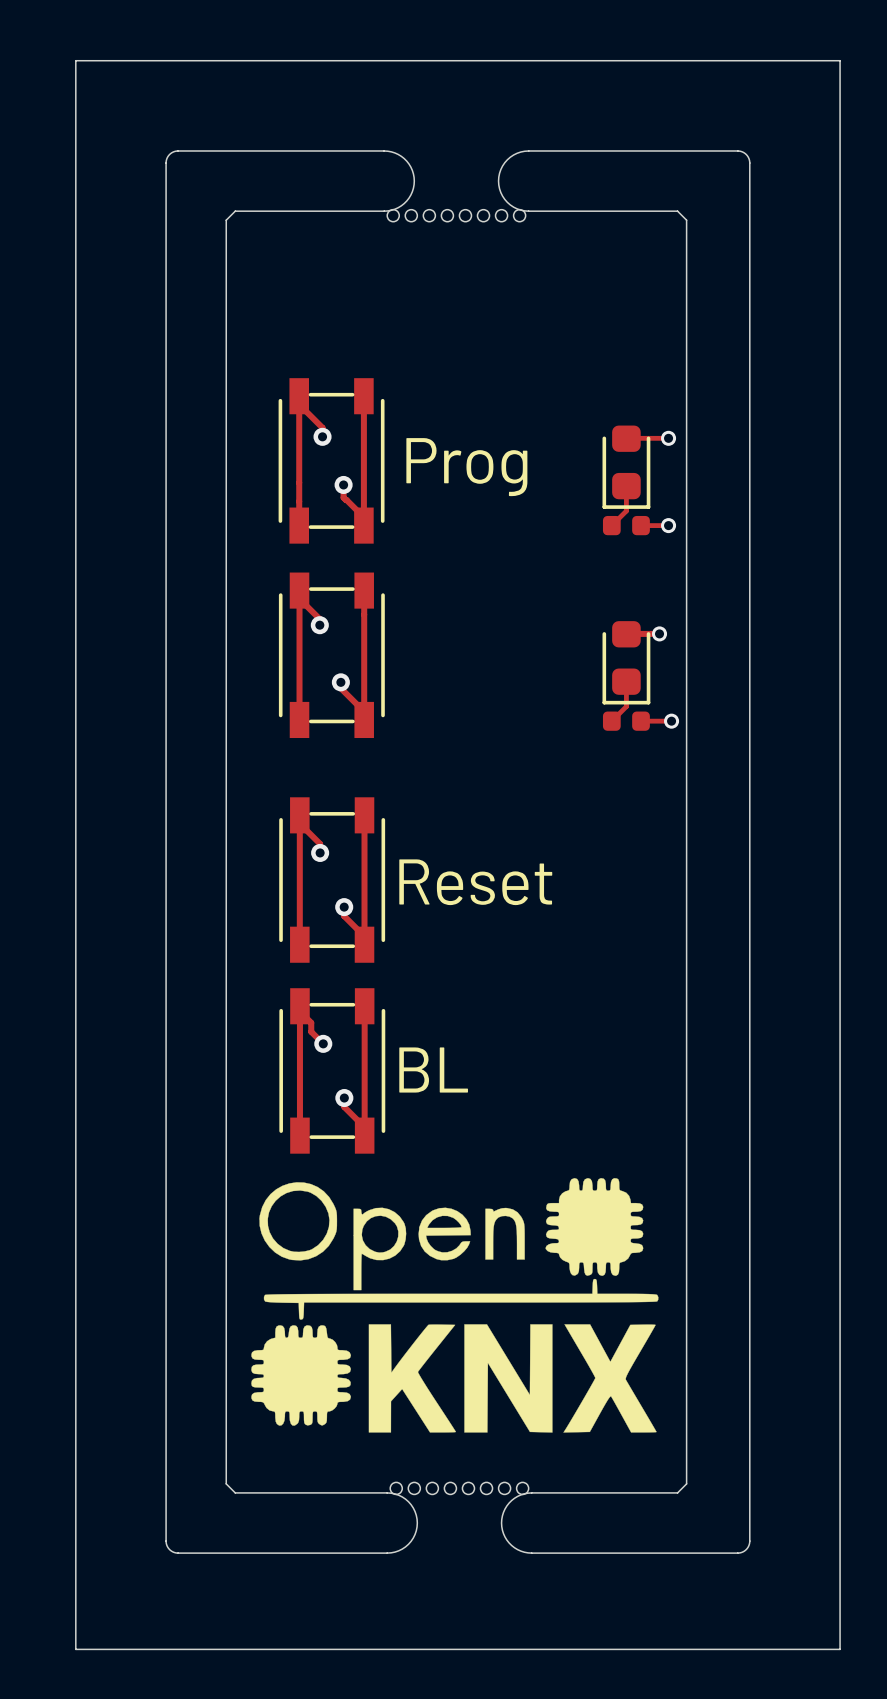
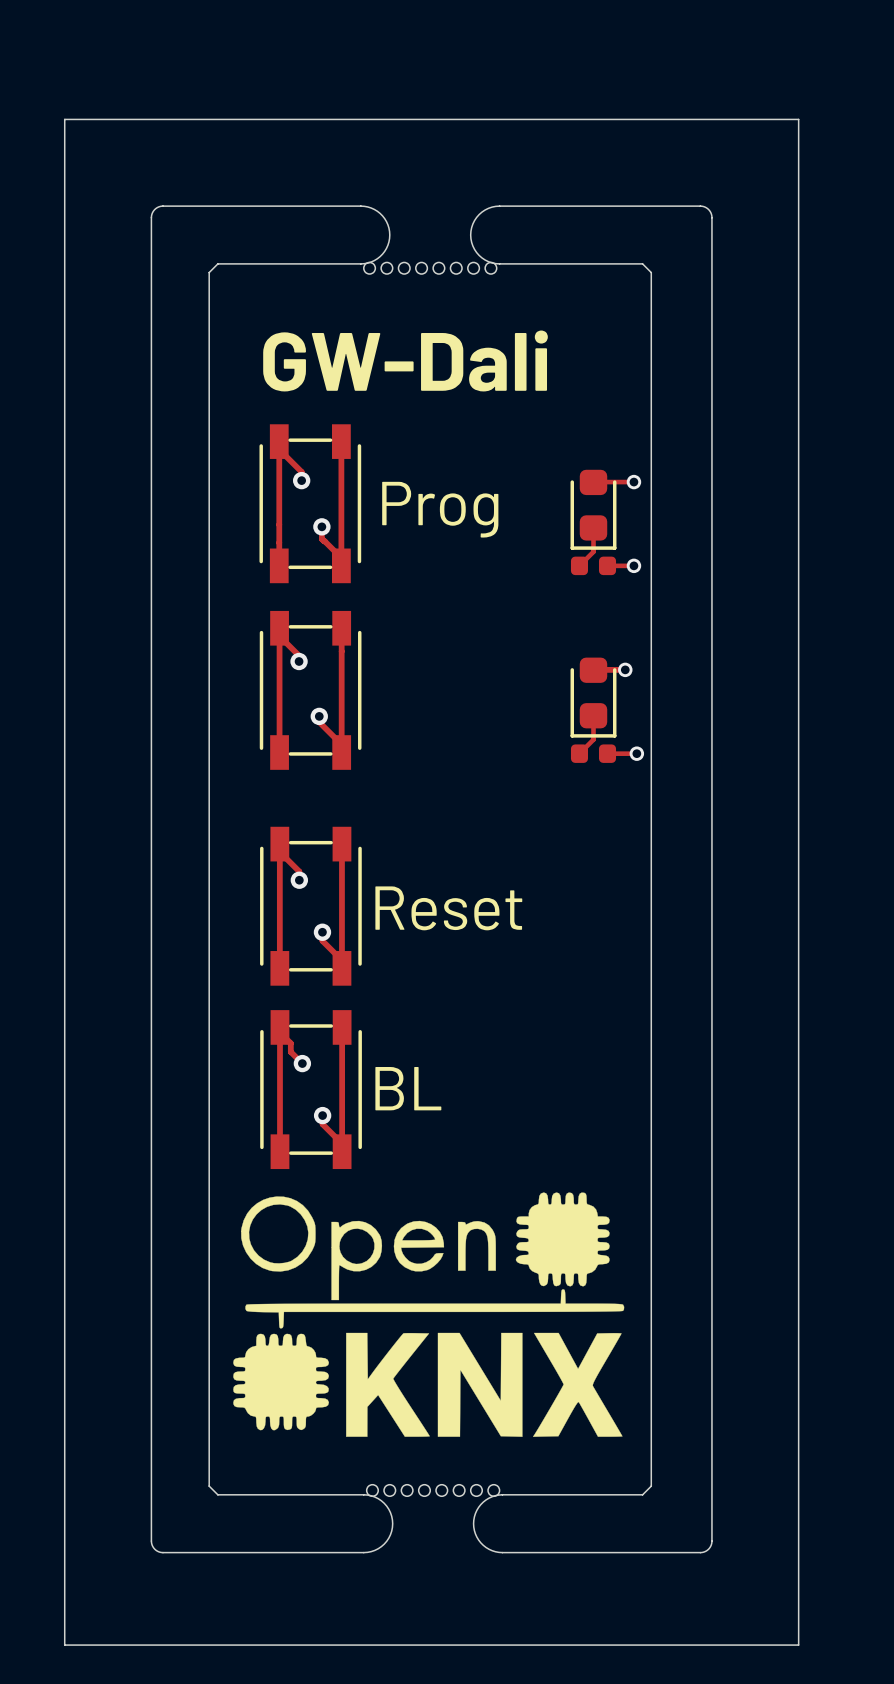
text: none -> GW-Dali (405, 360)

